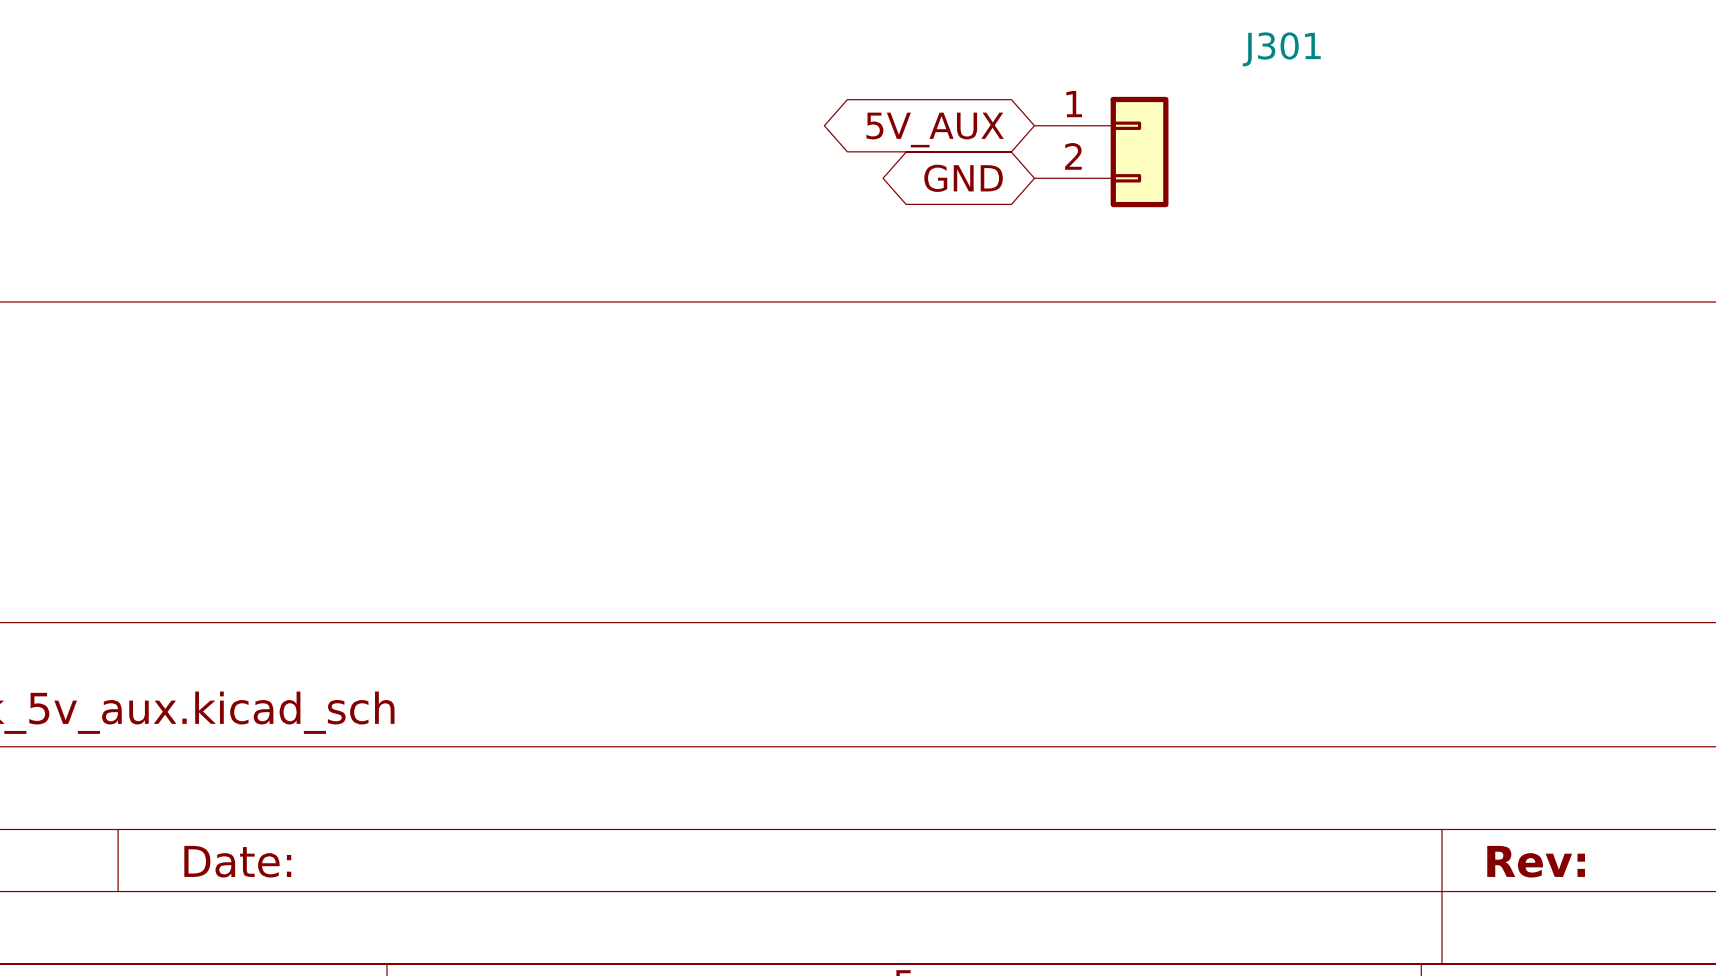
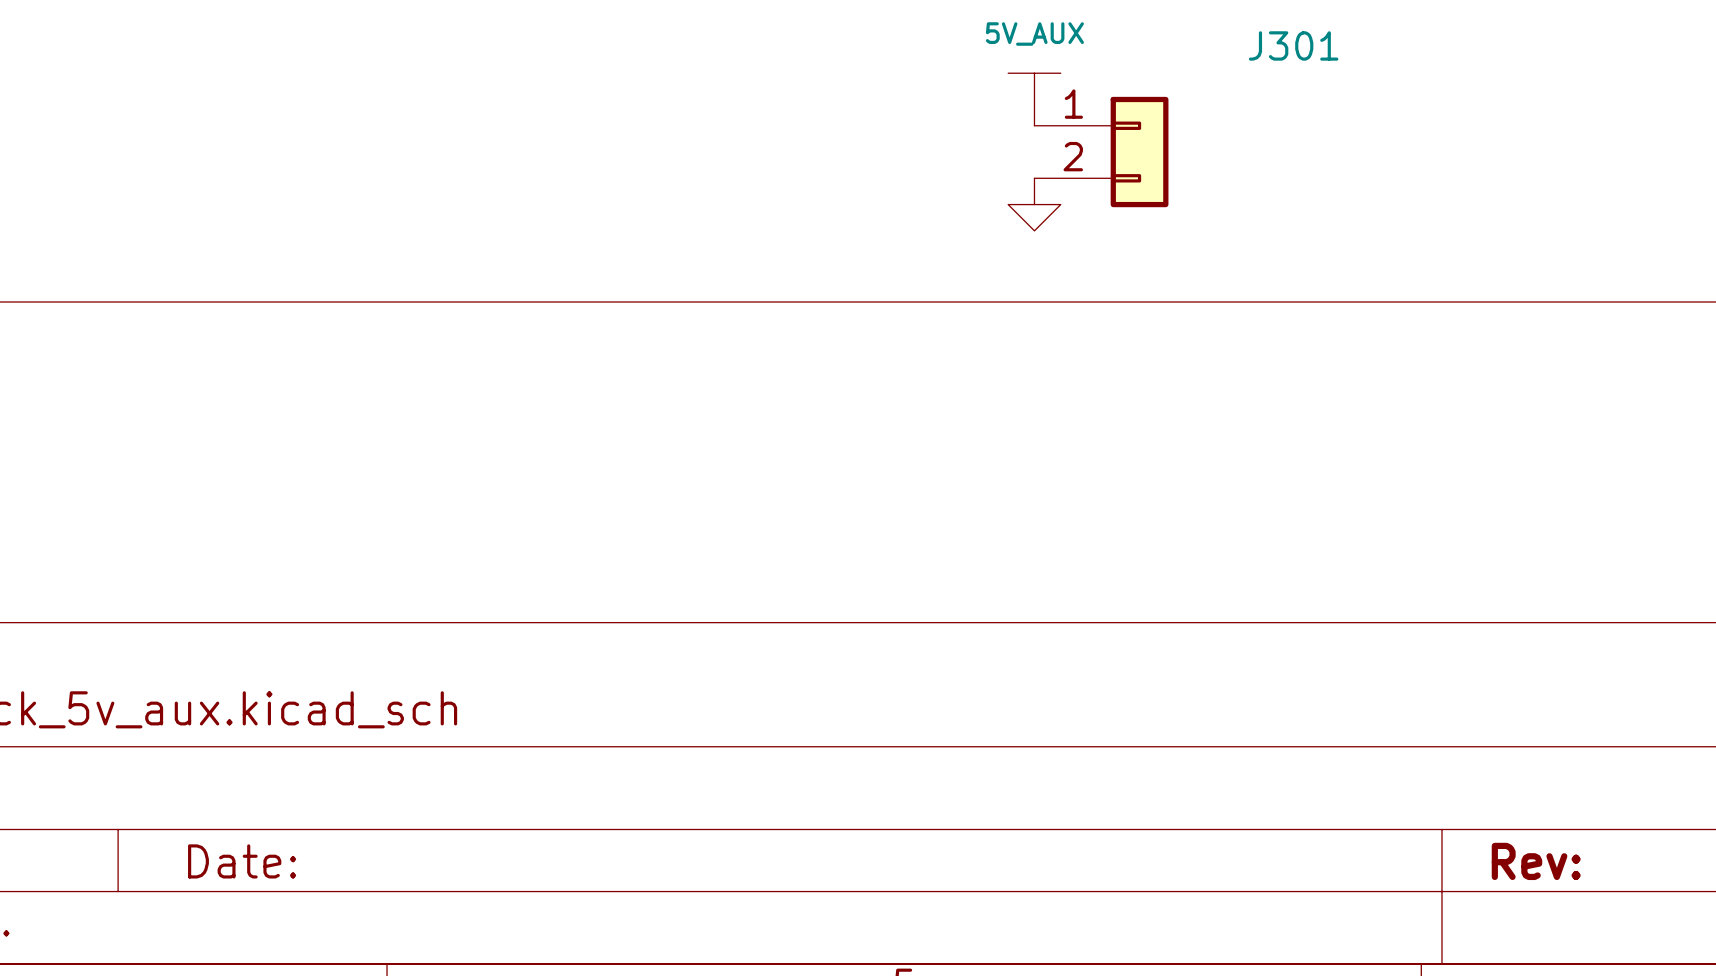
power symbol: none -> 5V_AUX (1034, 99)
global label: 5V_AUX (935, 130) -> none
global label: GND (963, 178) -> none
power symbol: none -> (1034, 204)

